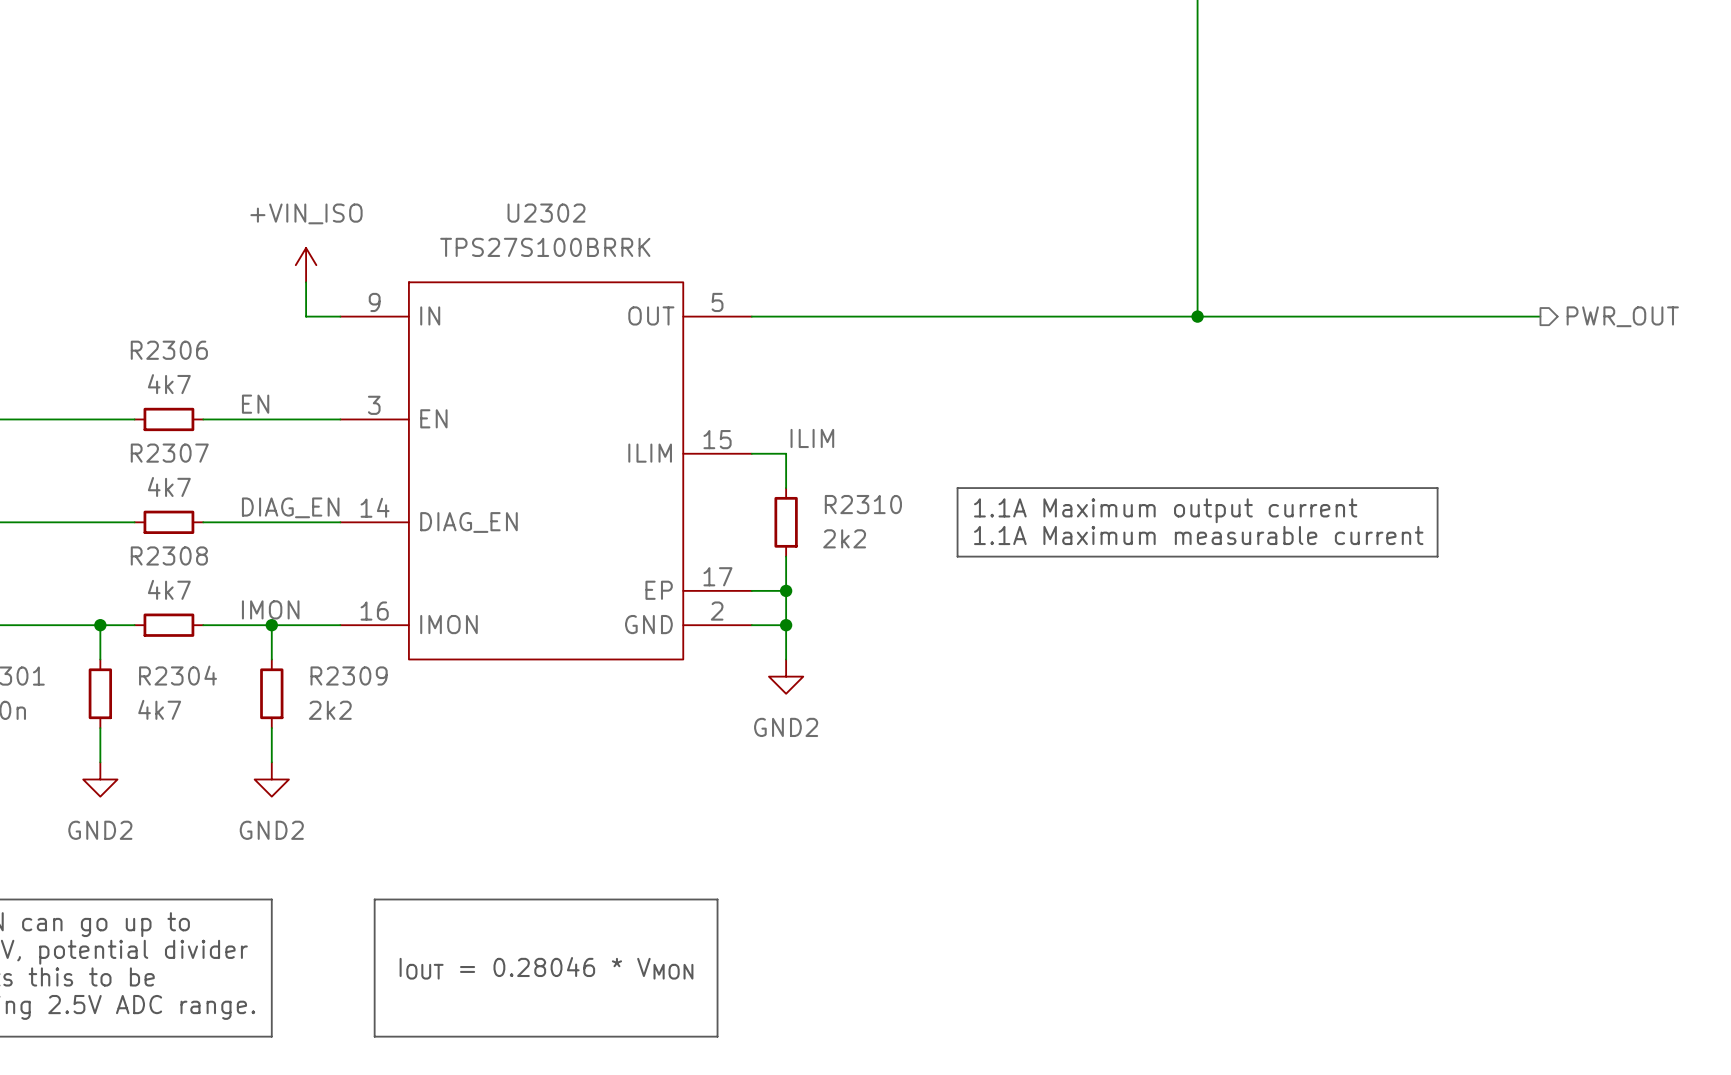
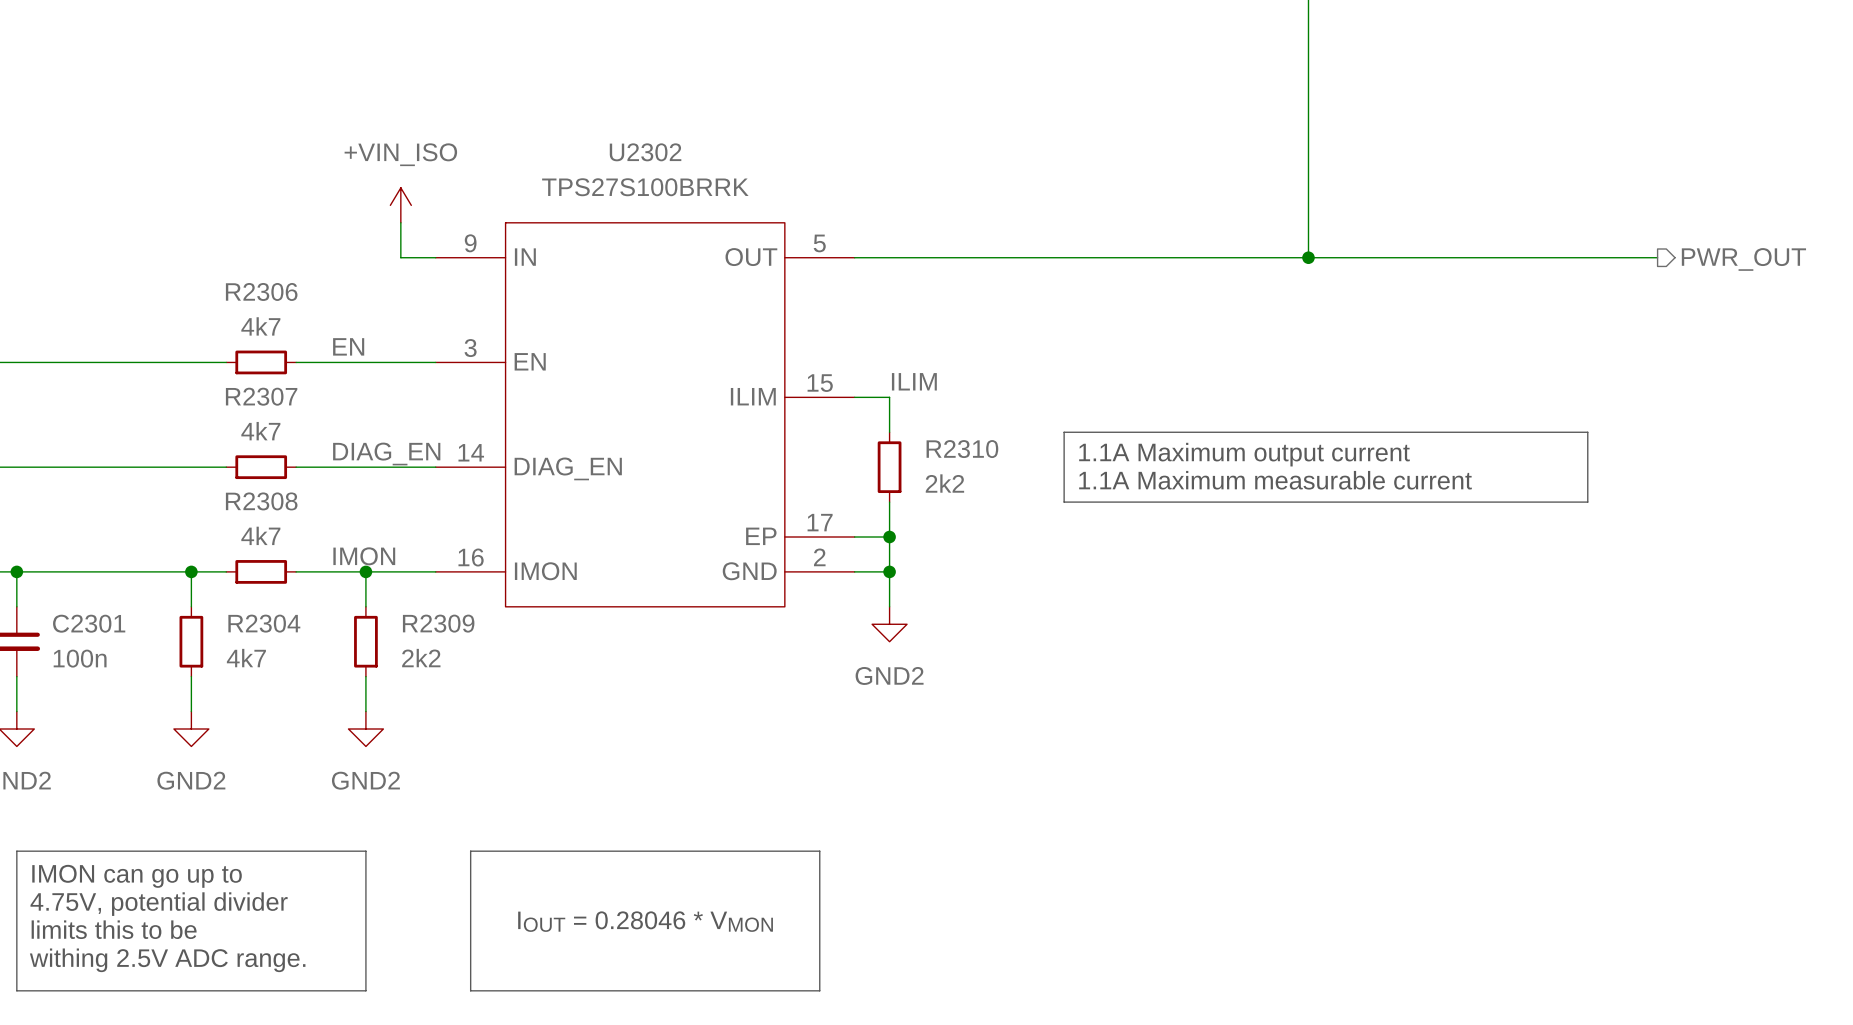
line: (1437, 488) (1437, 556) -> (1552, 432) (1587, 432) (1587, 502) (1552, 502)

